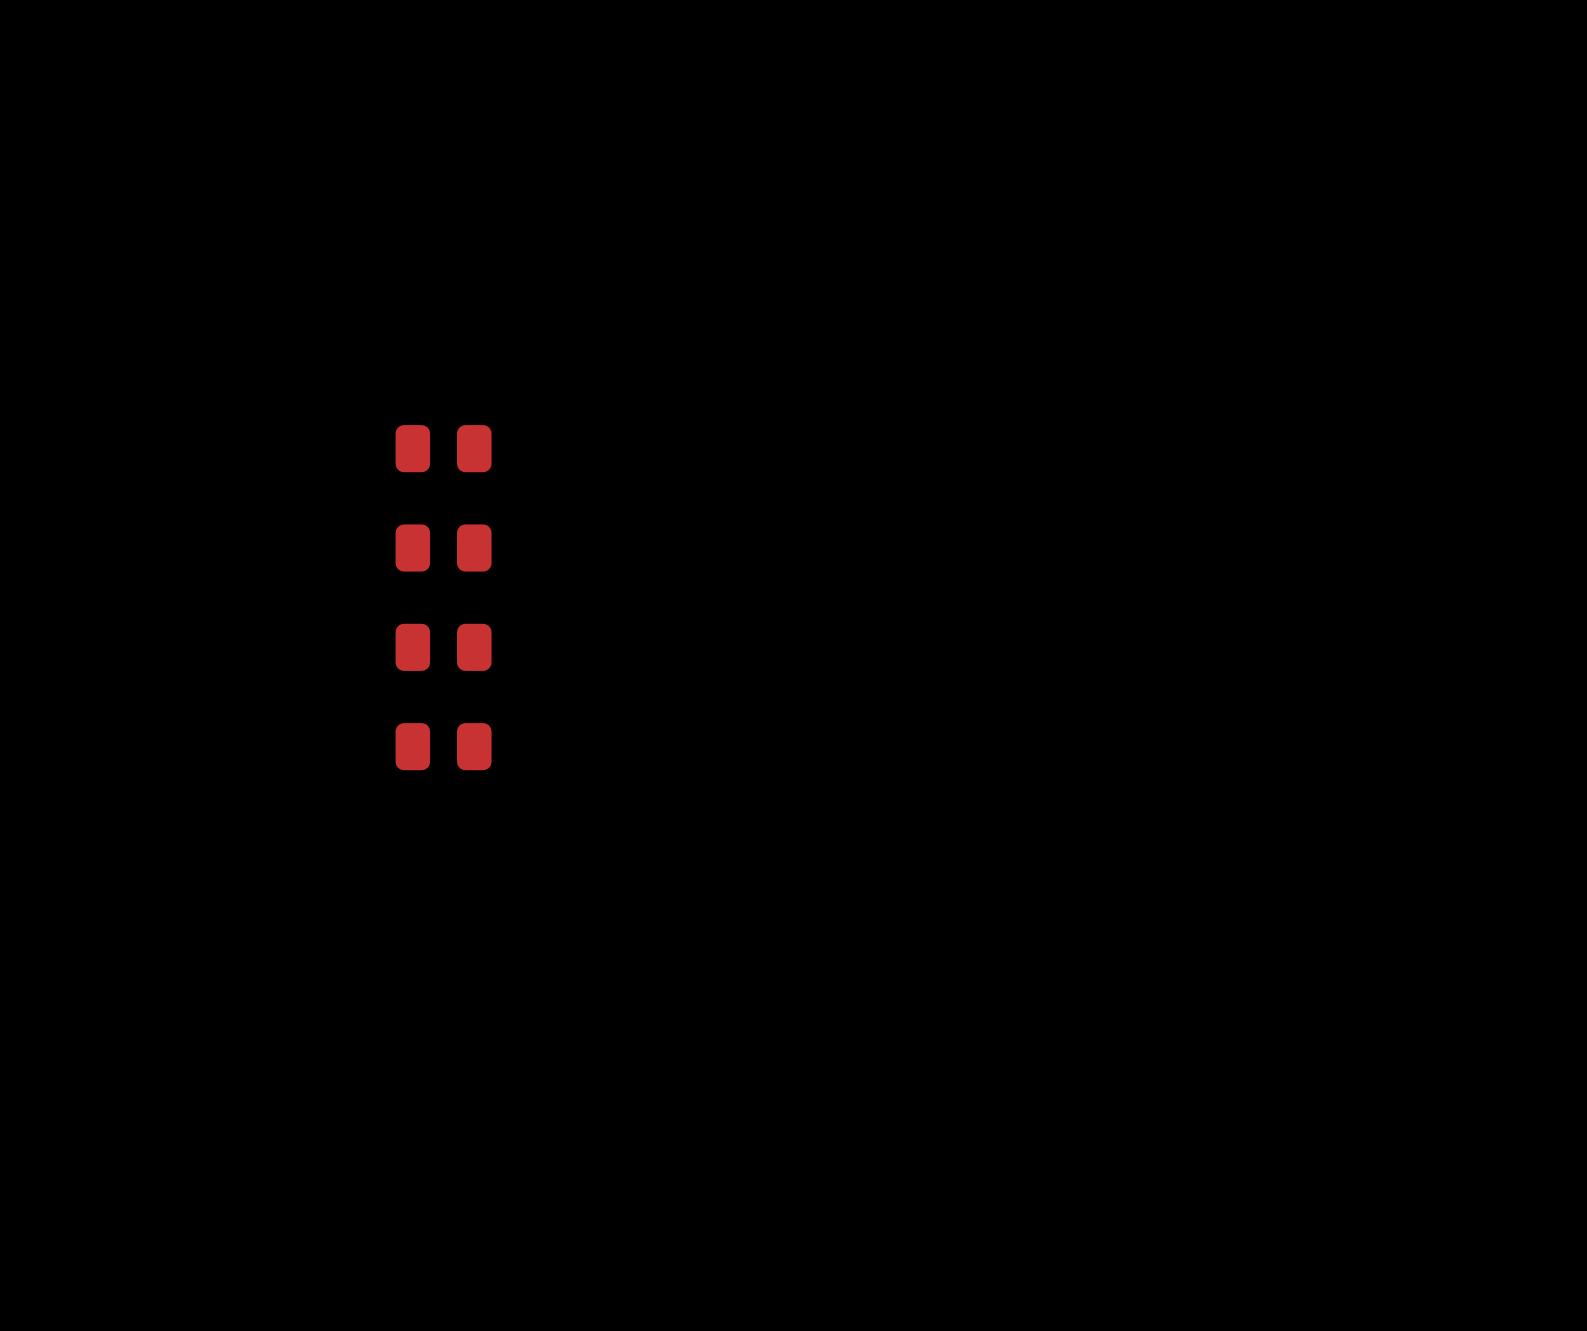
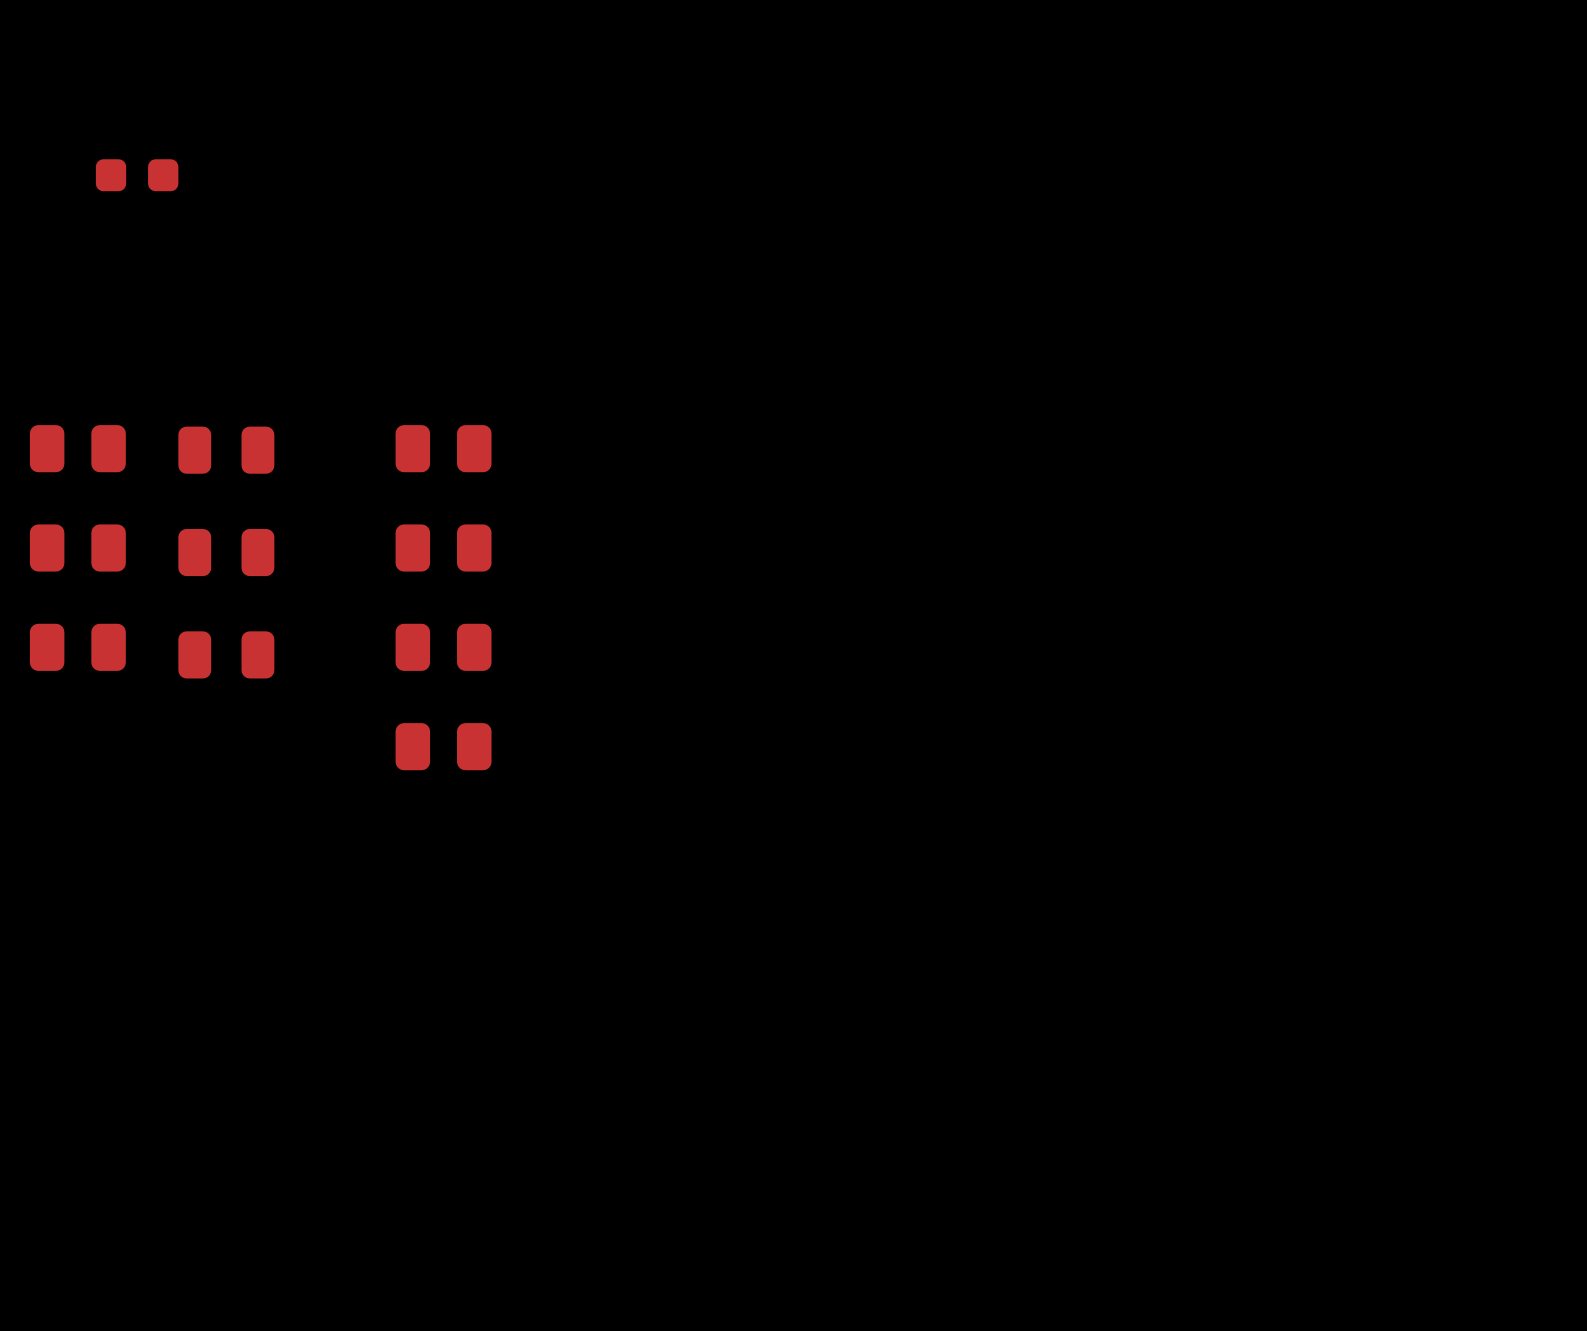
part: none -> (137, 175)
part: none -> (77, 448)
part: none -> (226, 450)
part: none -> (77, 547)
part: none -> (226, 552)
part: none -> (77, 647)
part: none -> (226, 654)

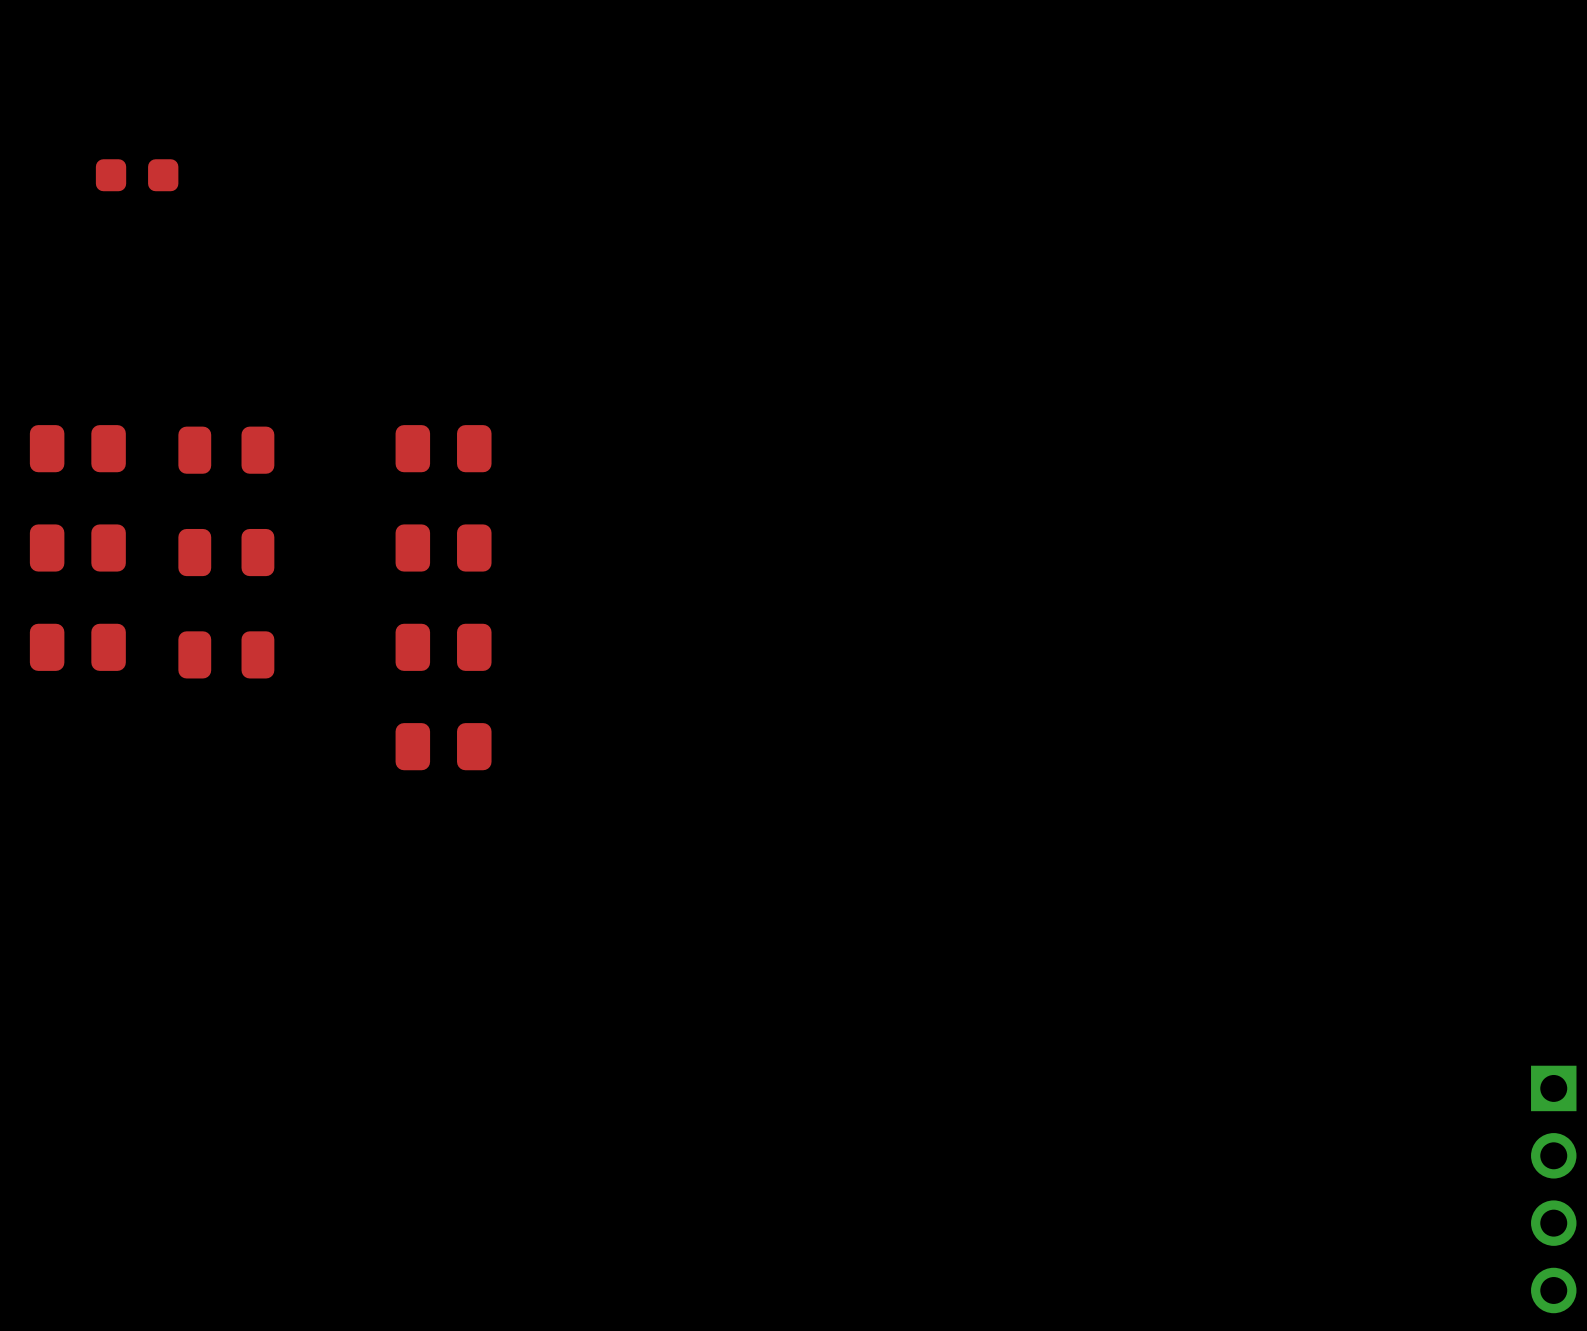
part: none -> (1553, 1189)

